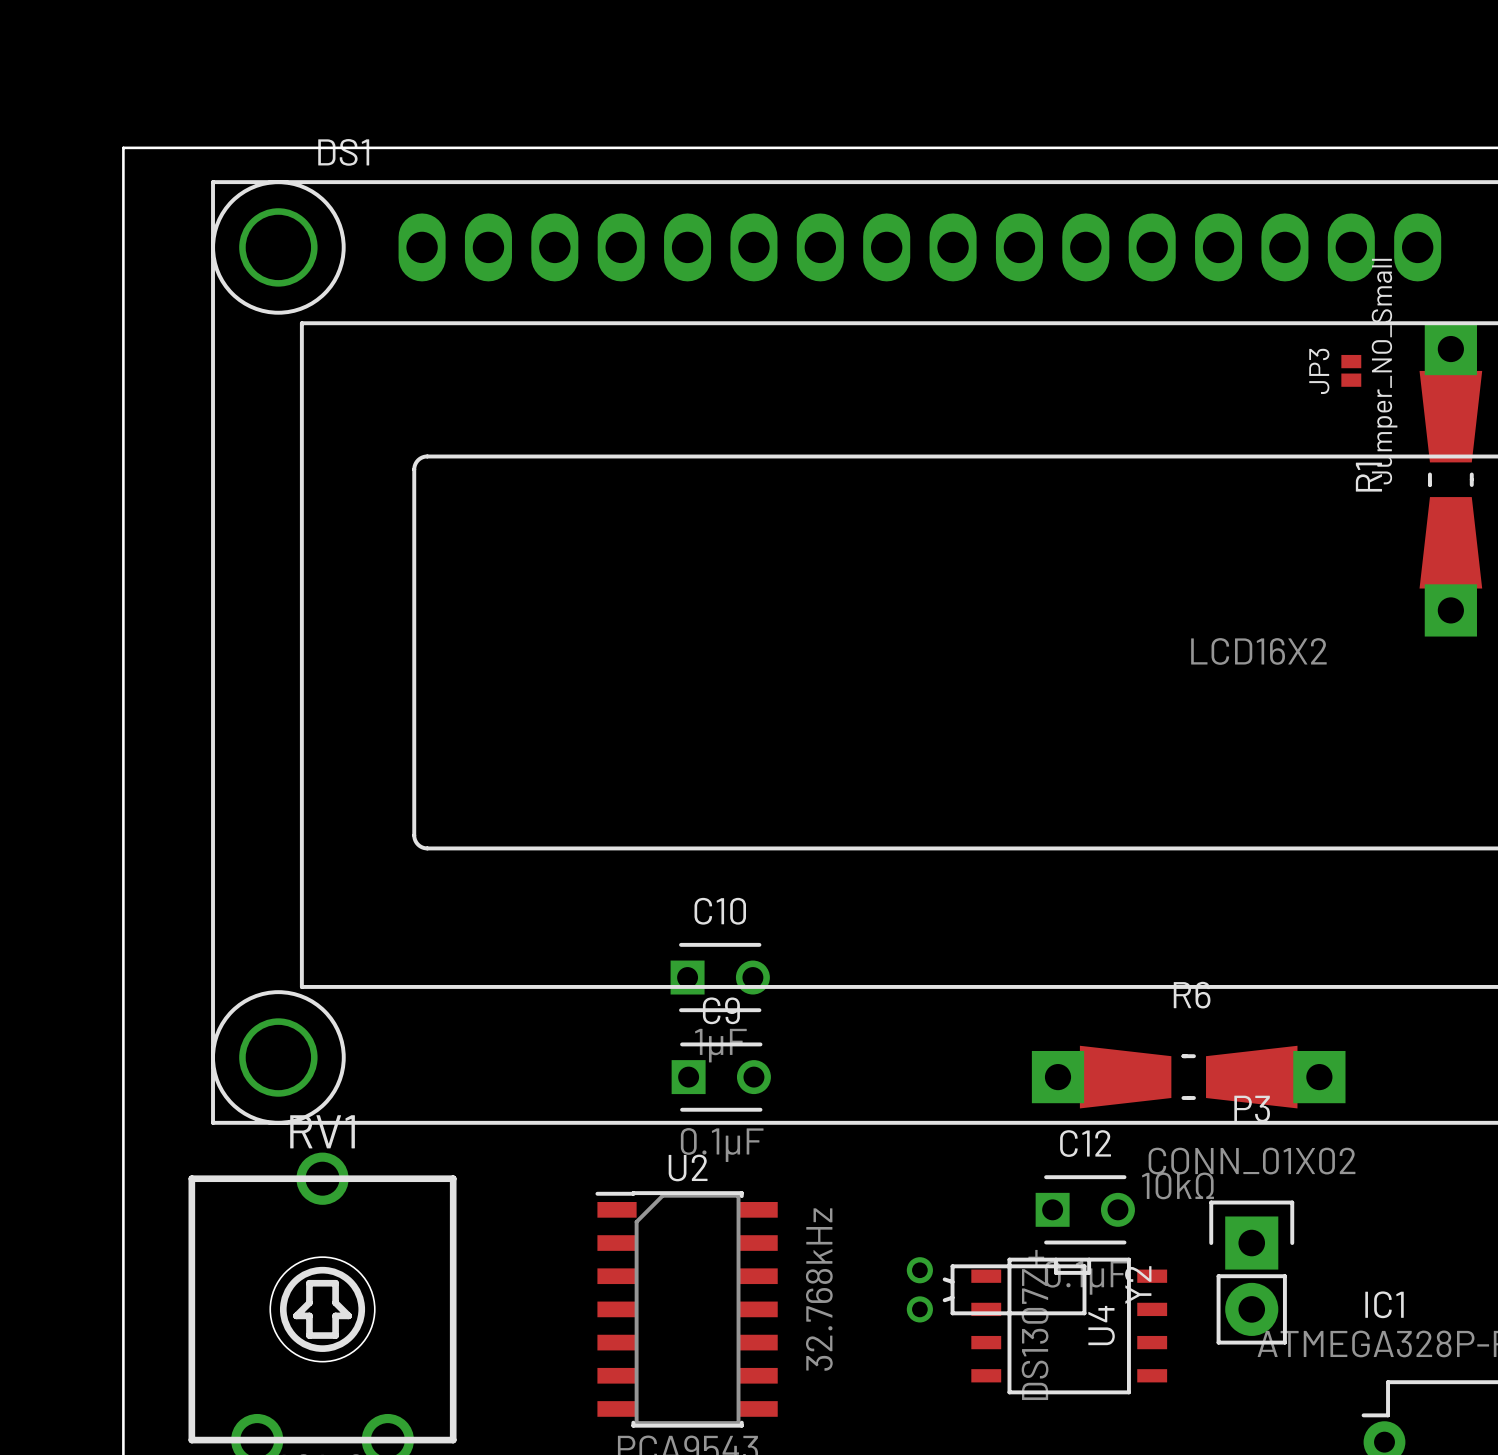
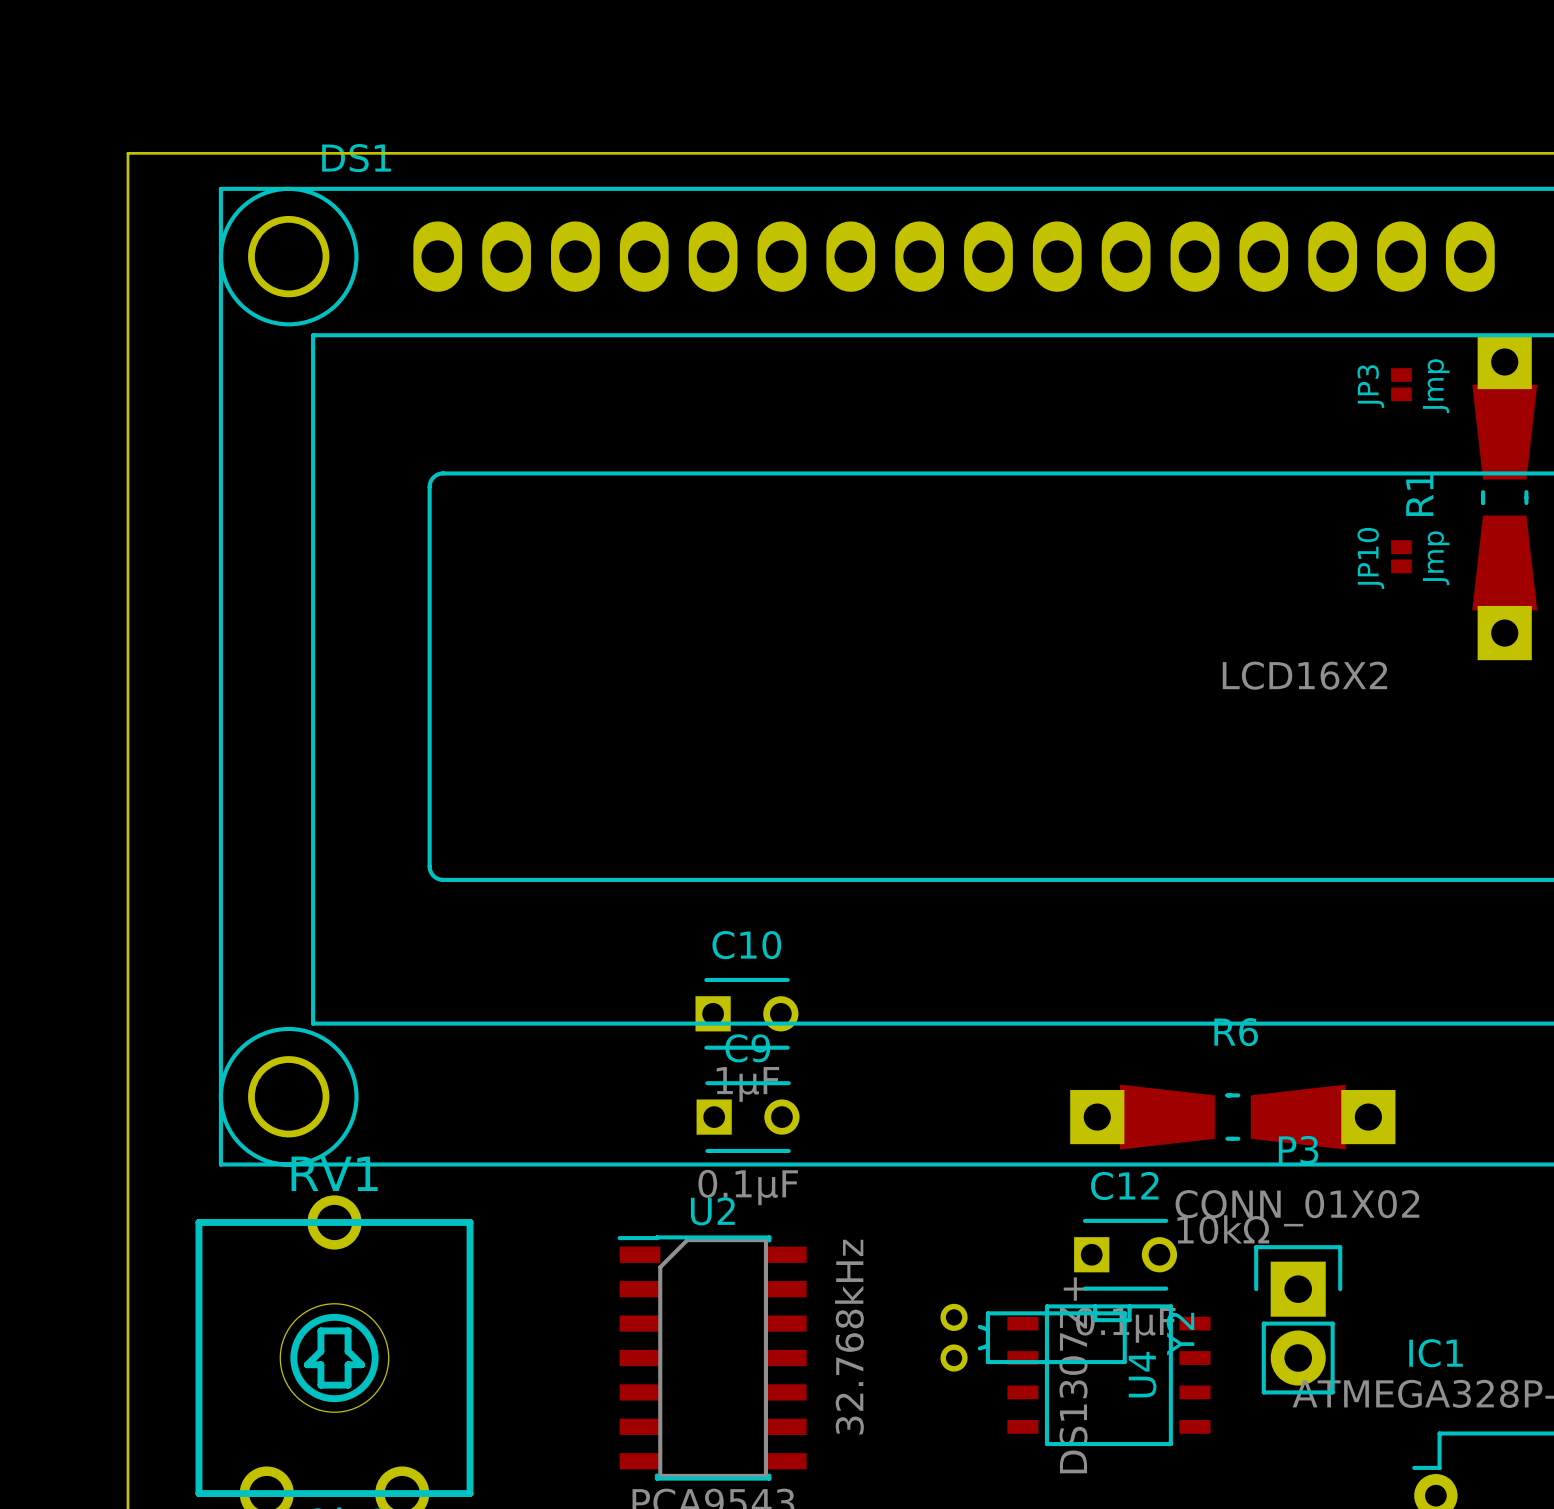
JP3 value: Jumper_NO_Small (1384, 371) -> Jmp (1436, 386)
JP10: none -> Jmp (1401, 556)

